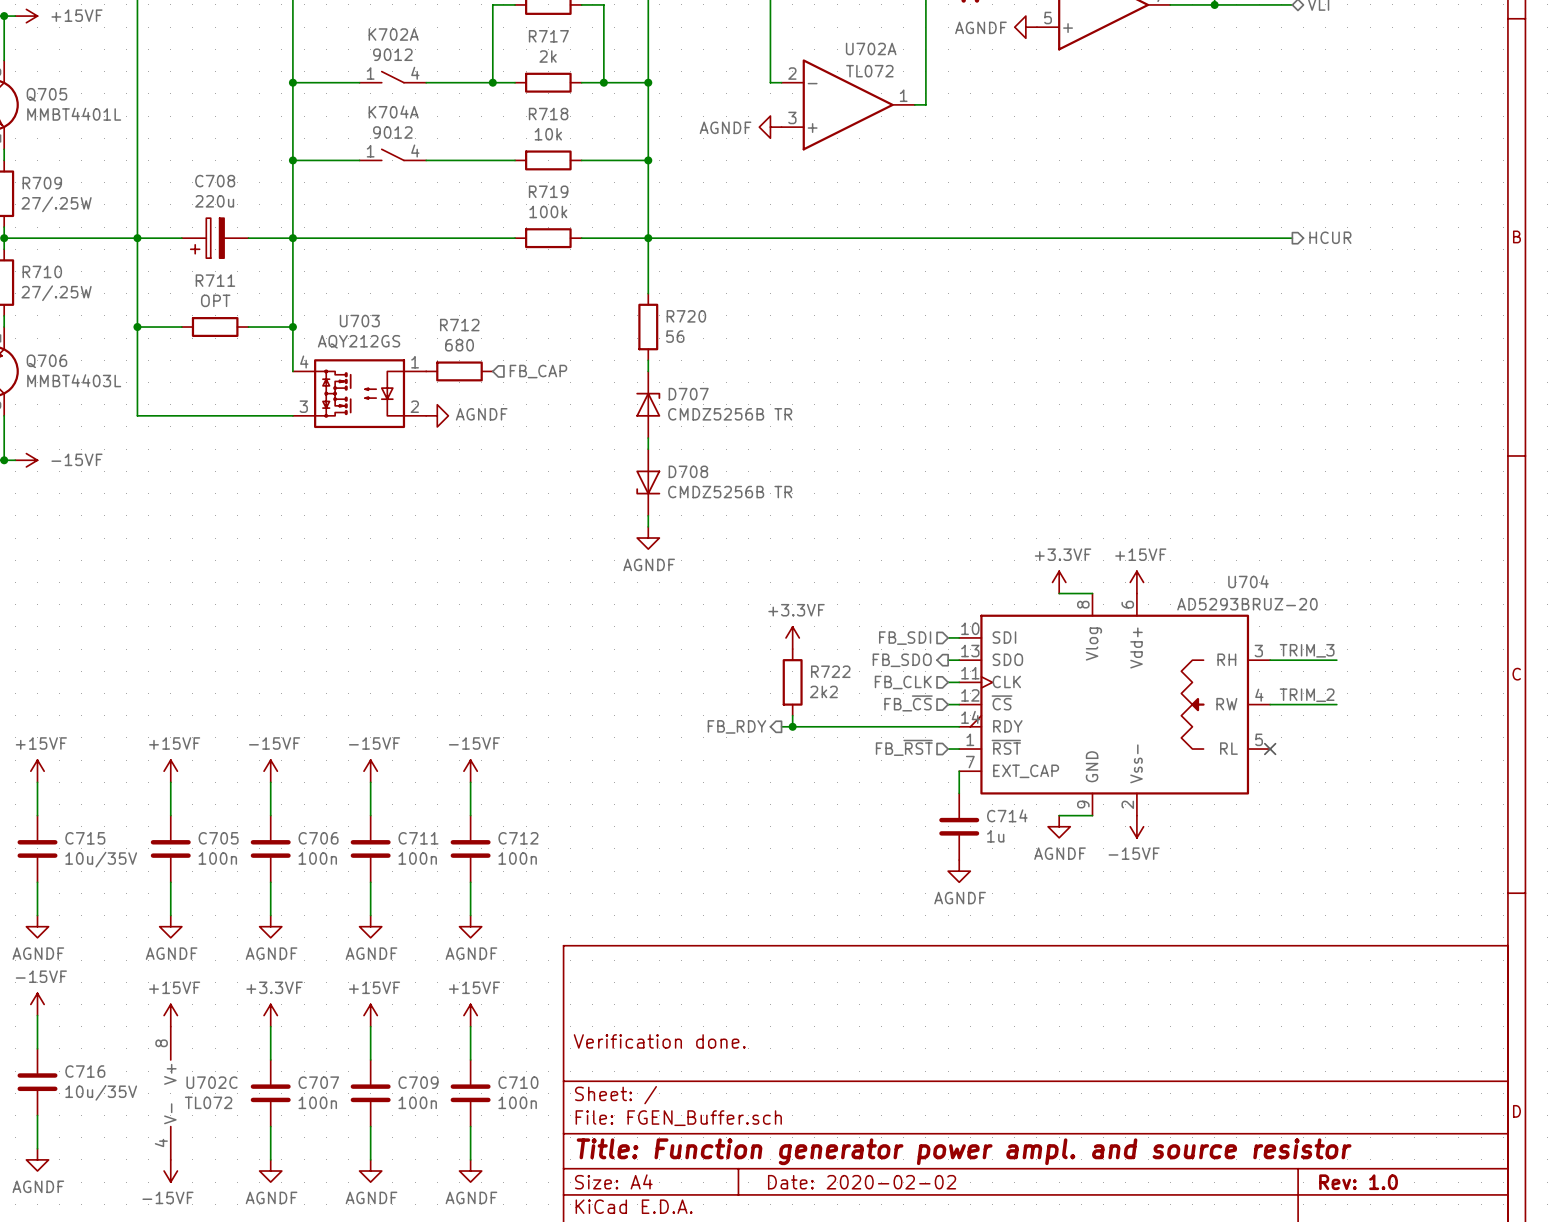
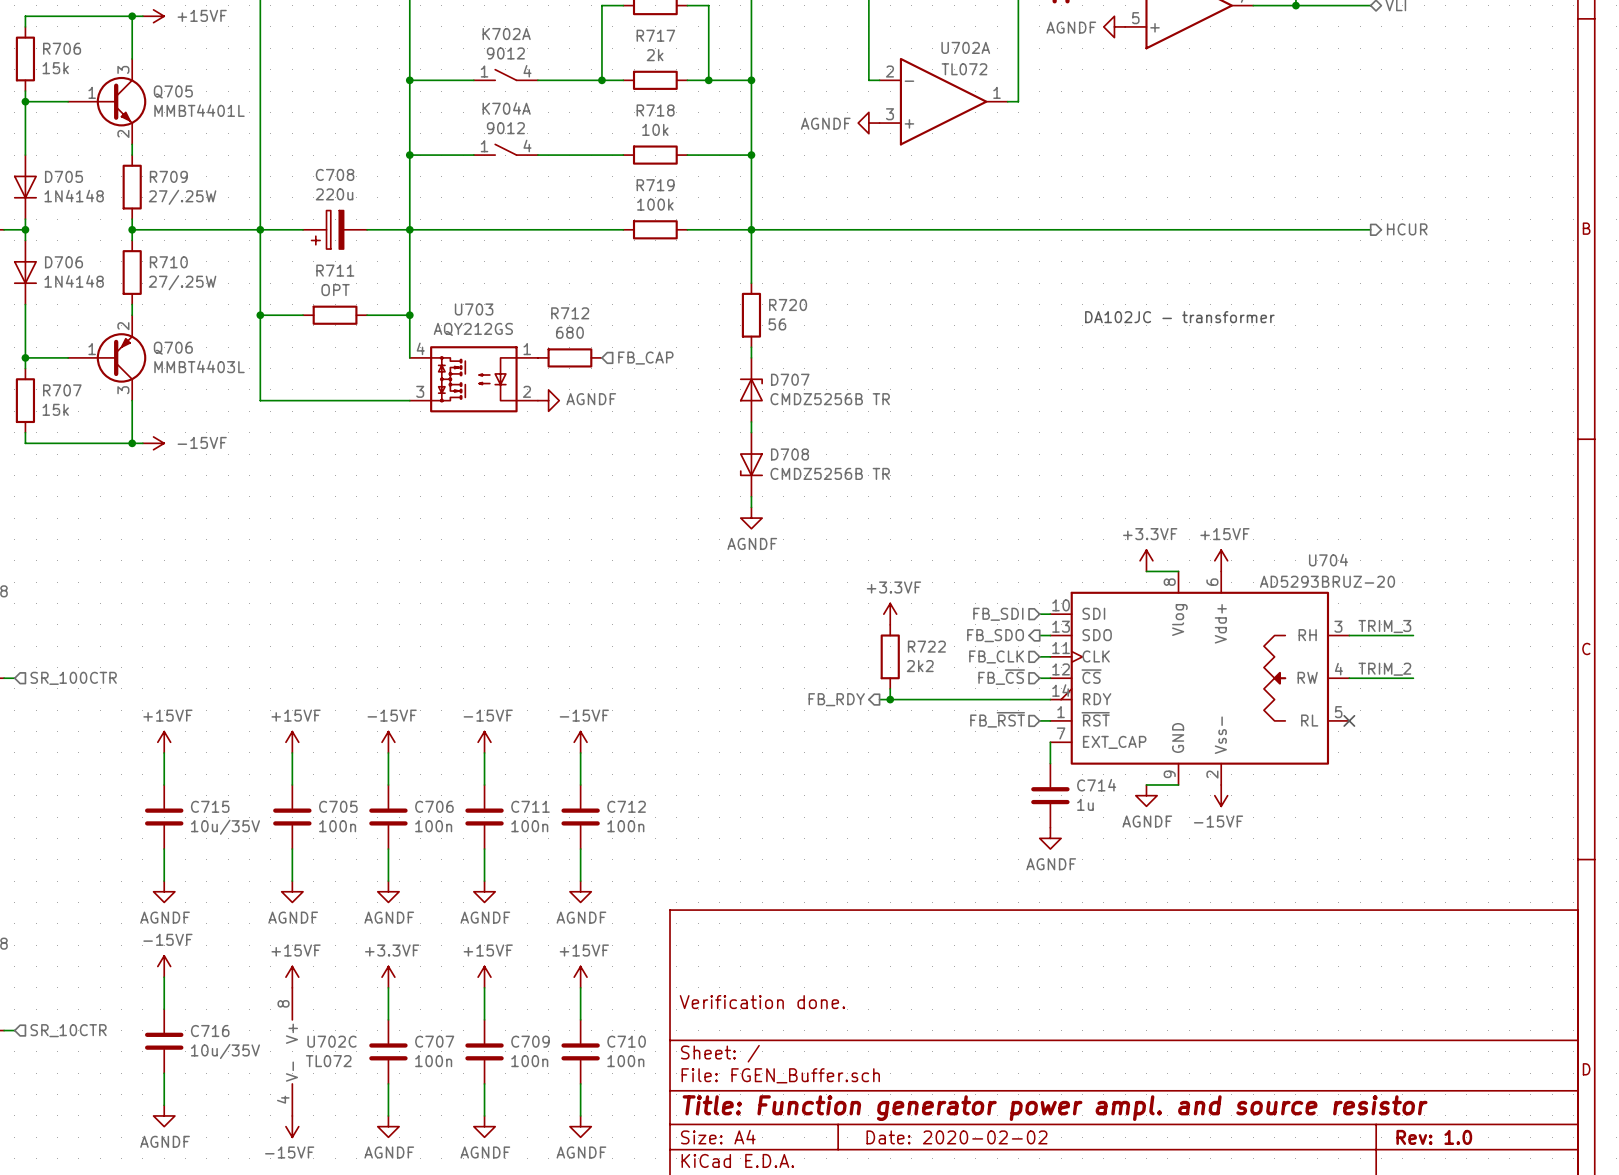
text: none -> DA102JC - transformer (1179, 317)

